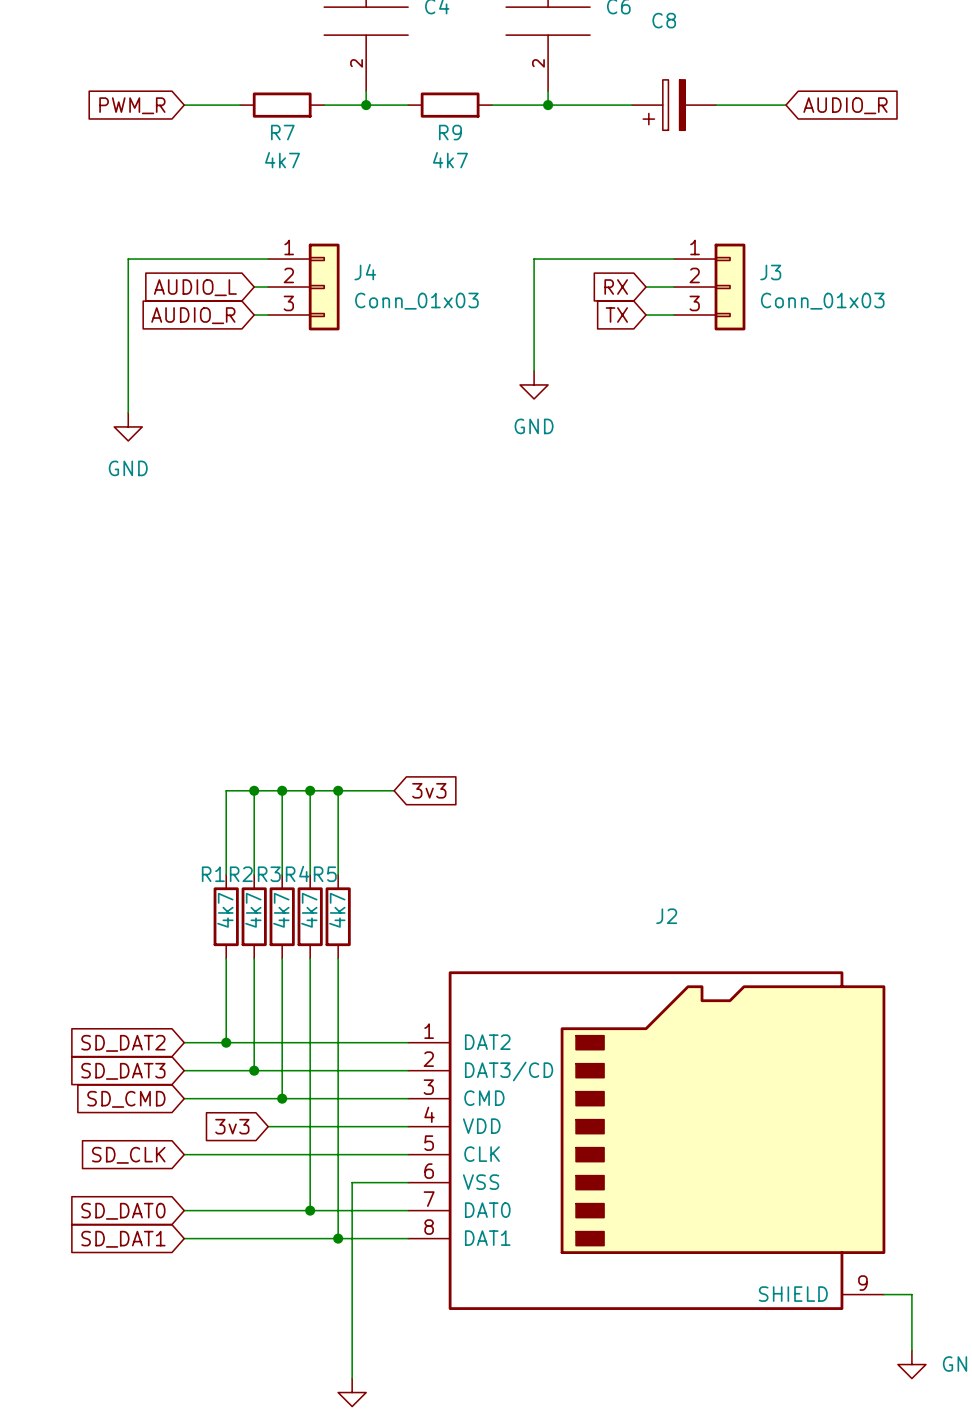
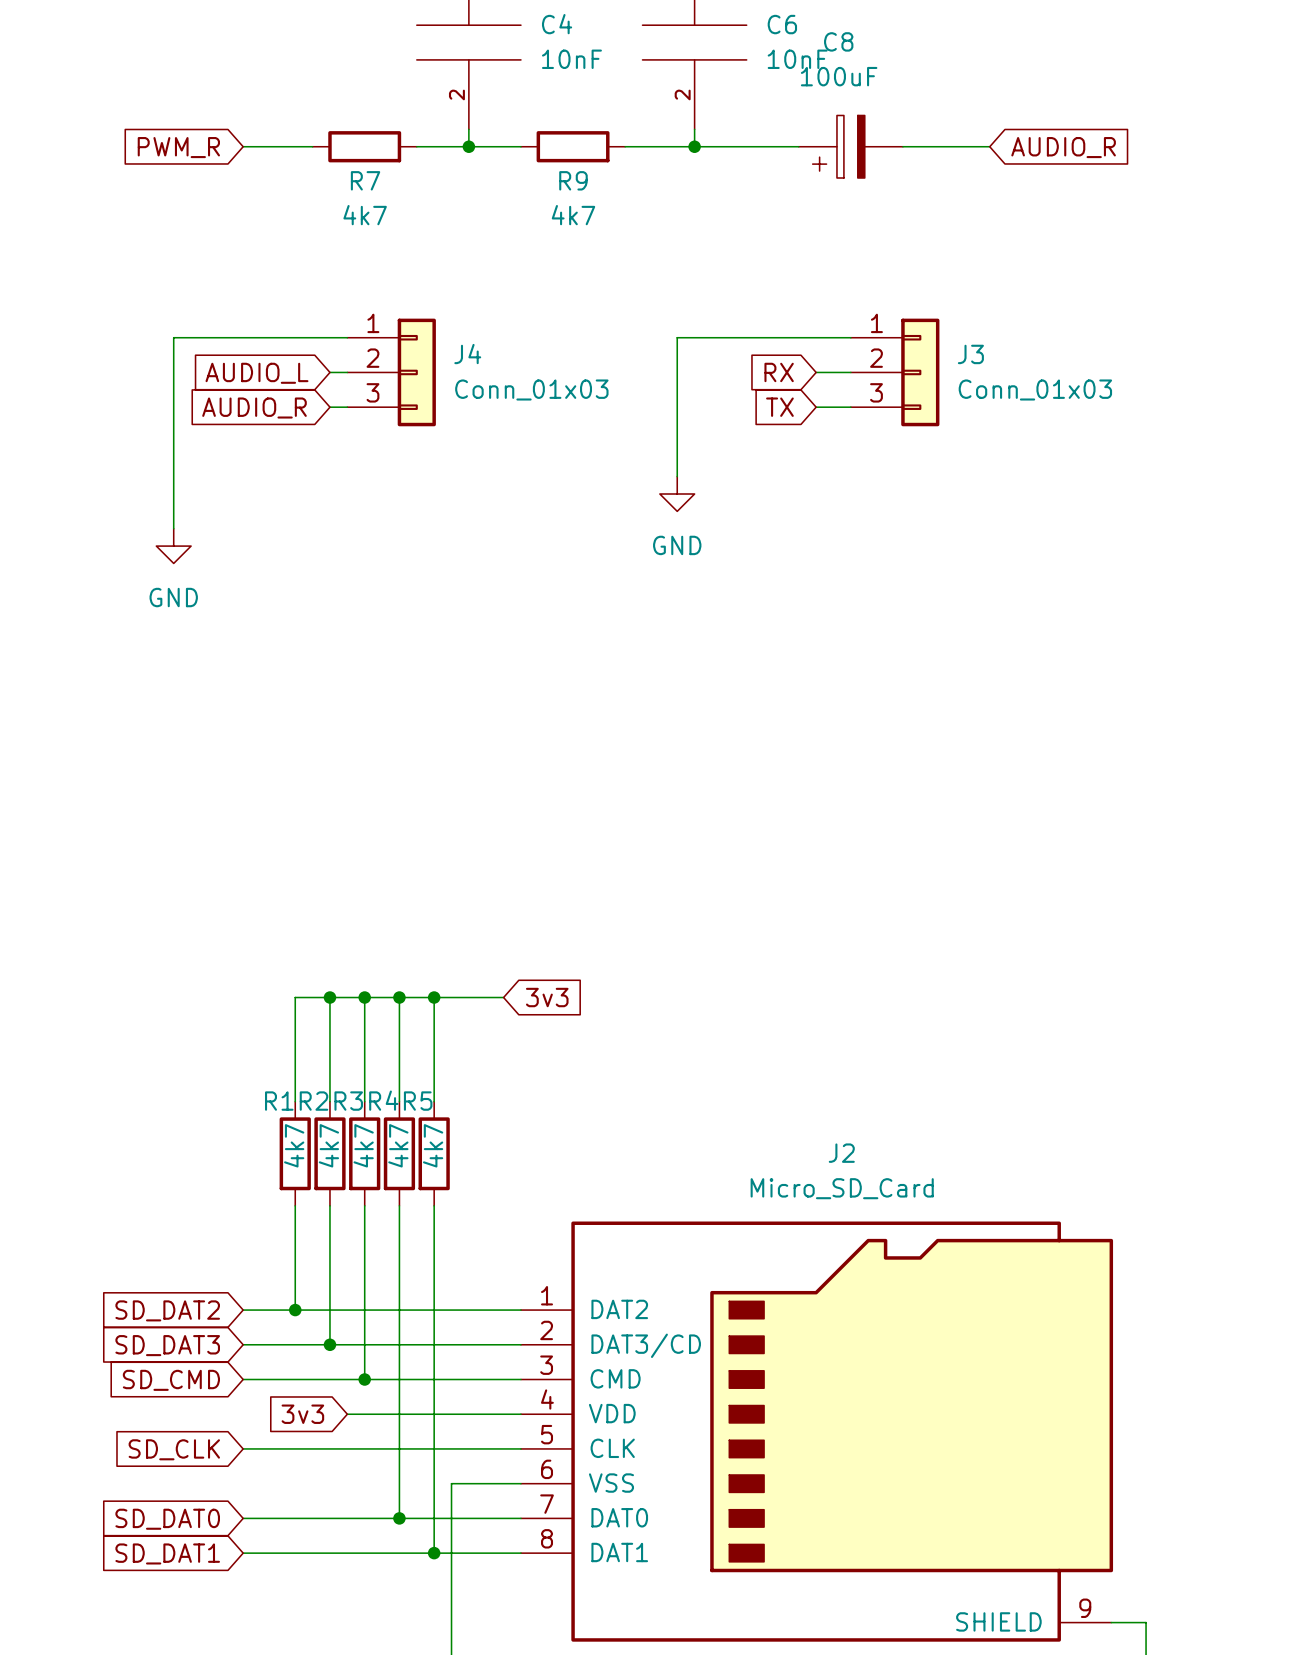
C4 value: none -> 10nF (571, 59)
C6 value: none -> 10nF (797, 59)
C8 value: none -> 100uF (839, 76)
J2 value: none -> Micro_SD_Card (842, 1188)

